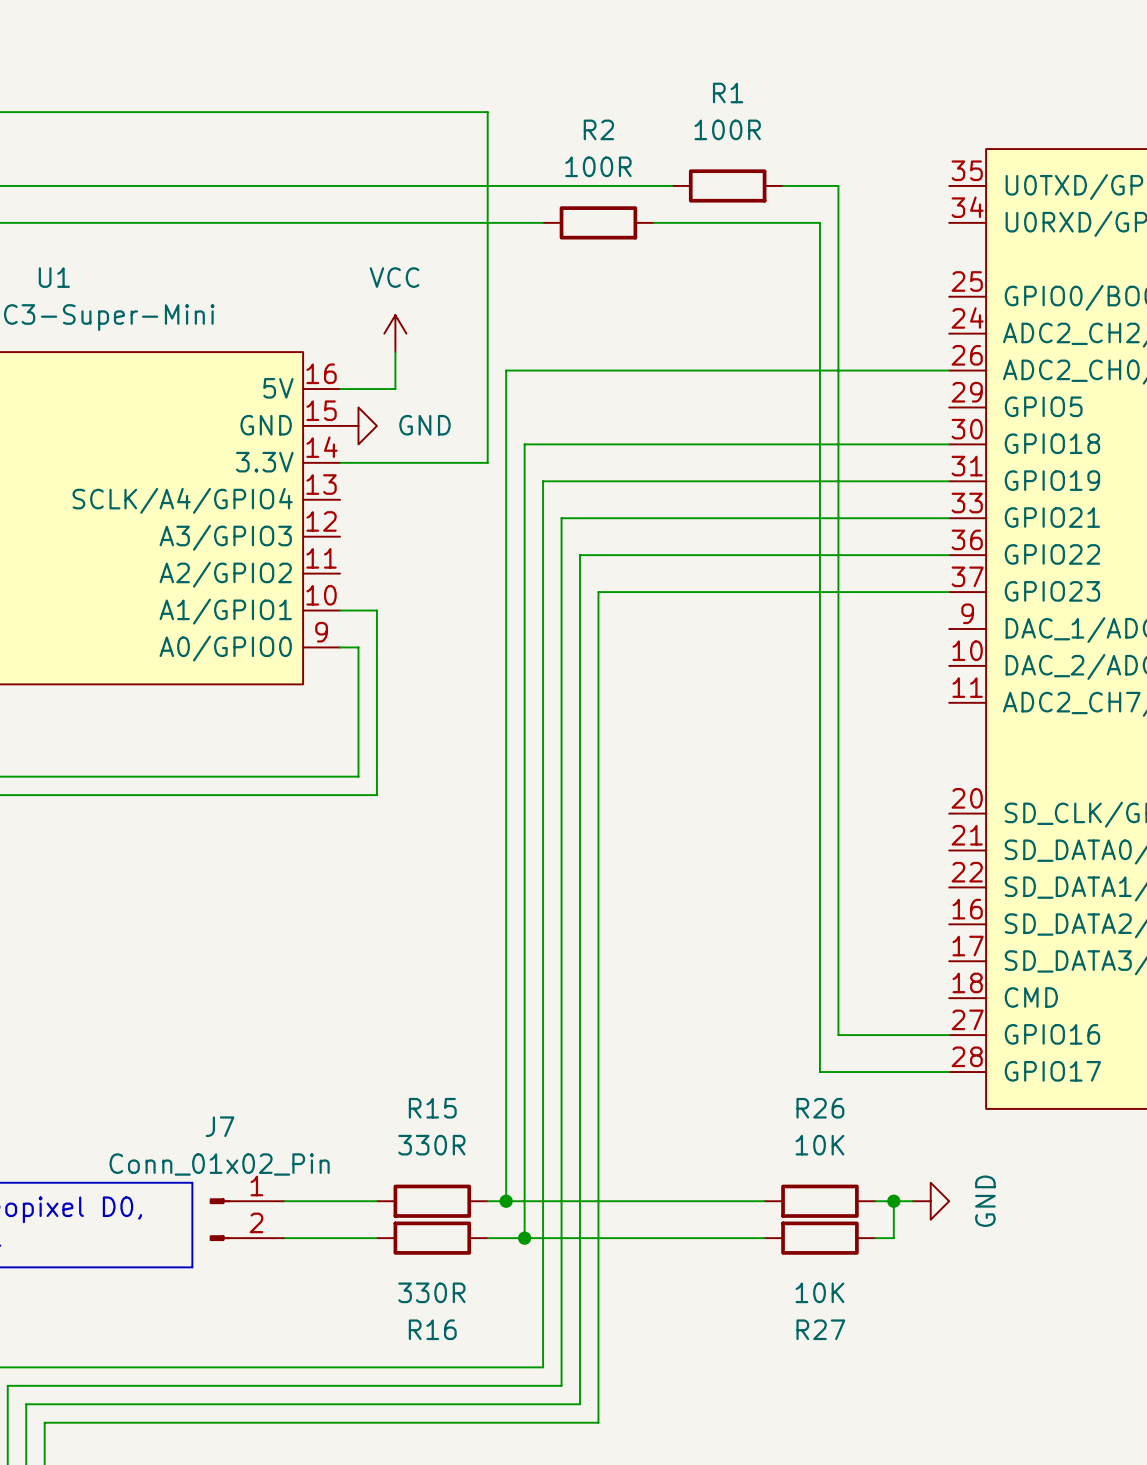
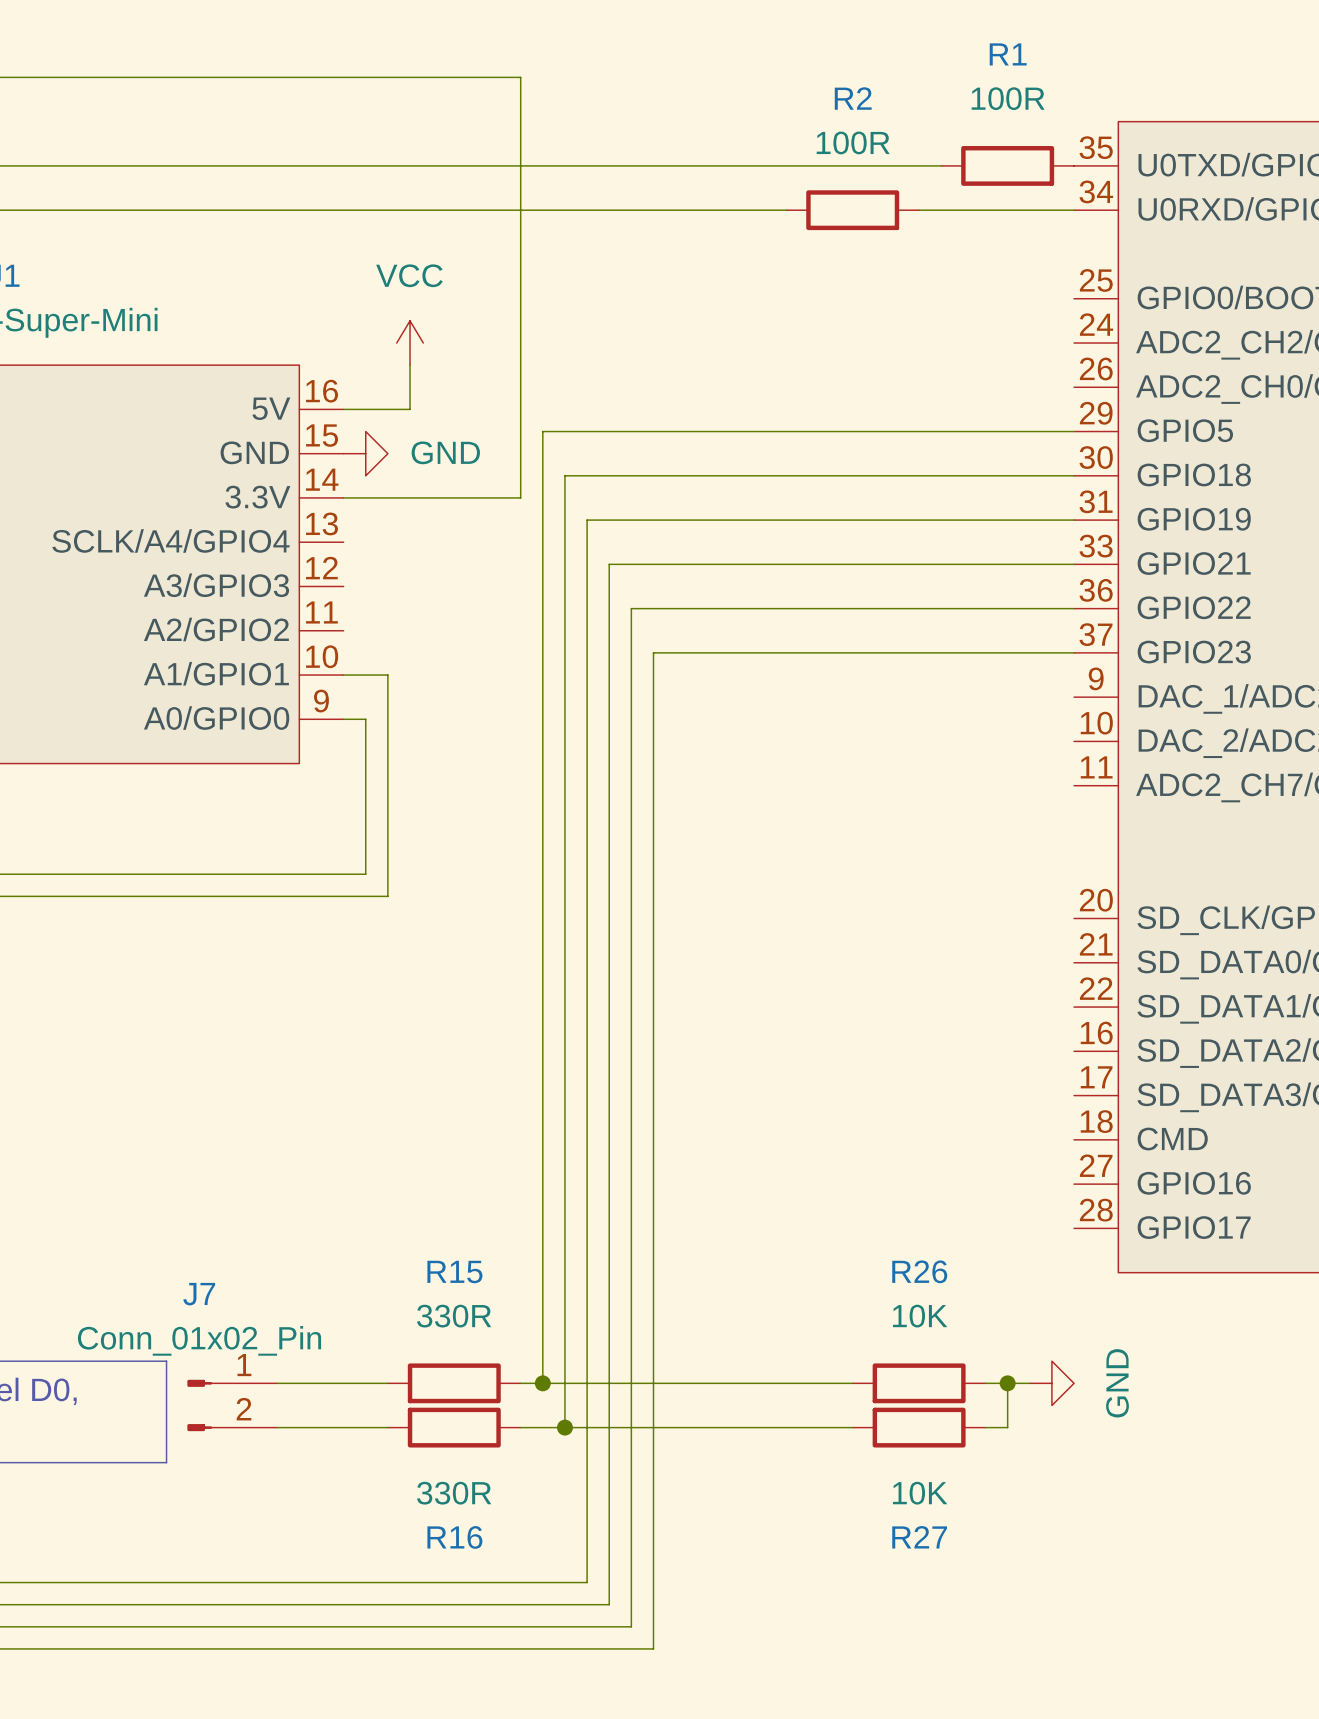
wire: none -> (742, 165) (874, 165)
R1 position: (727, 185) -> (1007, 165)
wire: (838, 185) (838, 1035) (949, 1035) -> none
wire: none -> (587, 210) (719, 210)
R2 position: (598, 222) -> (852, 210)
wire: (709, 222) (819, 222) (819, 1072) (949, 1072) -> none
wire: none -> (919, 210) (1074, 210)
wire: (949, 370) (506, 370) (506, 407) -> (1074, 431) (542, 431)

